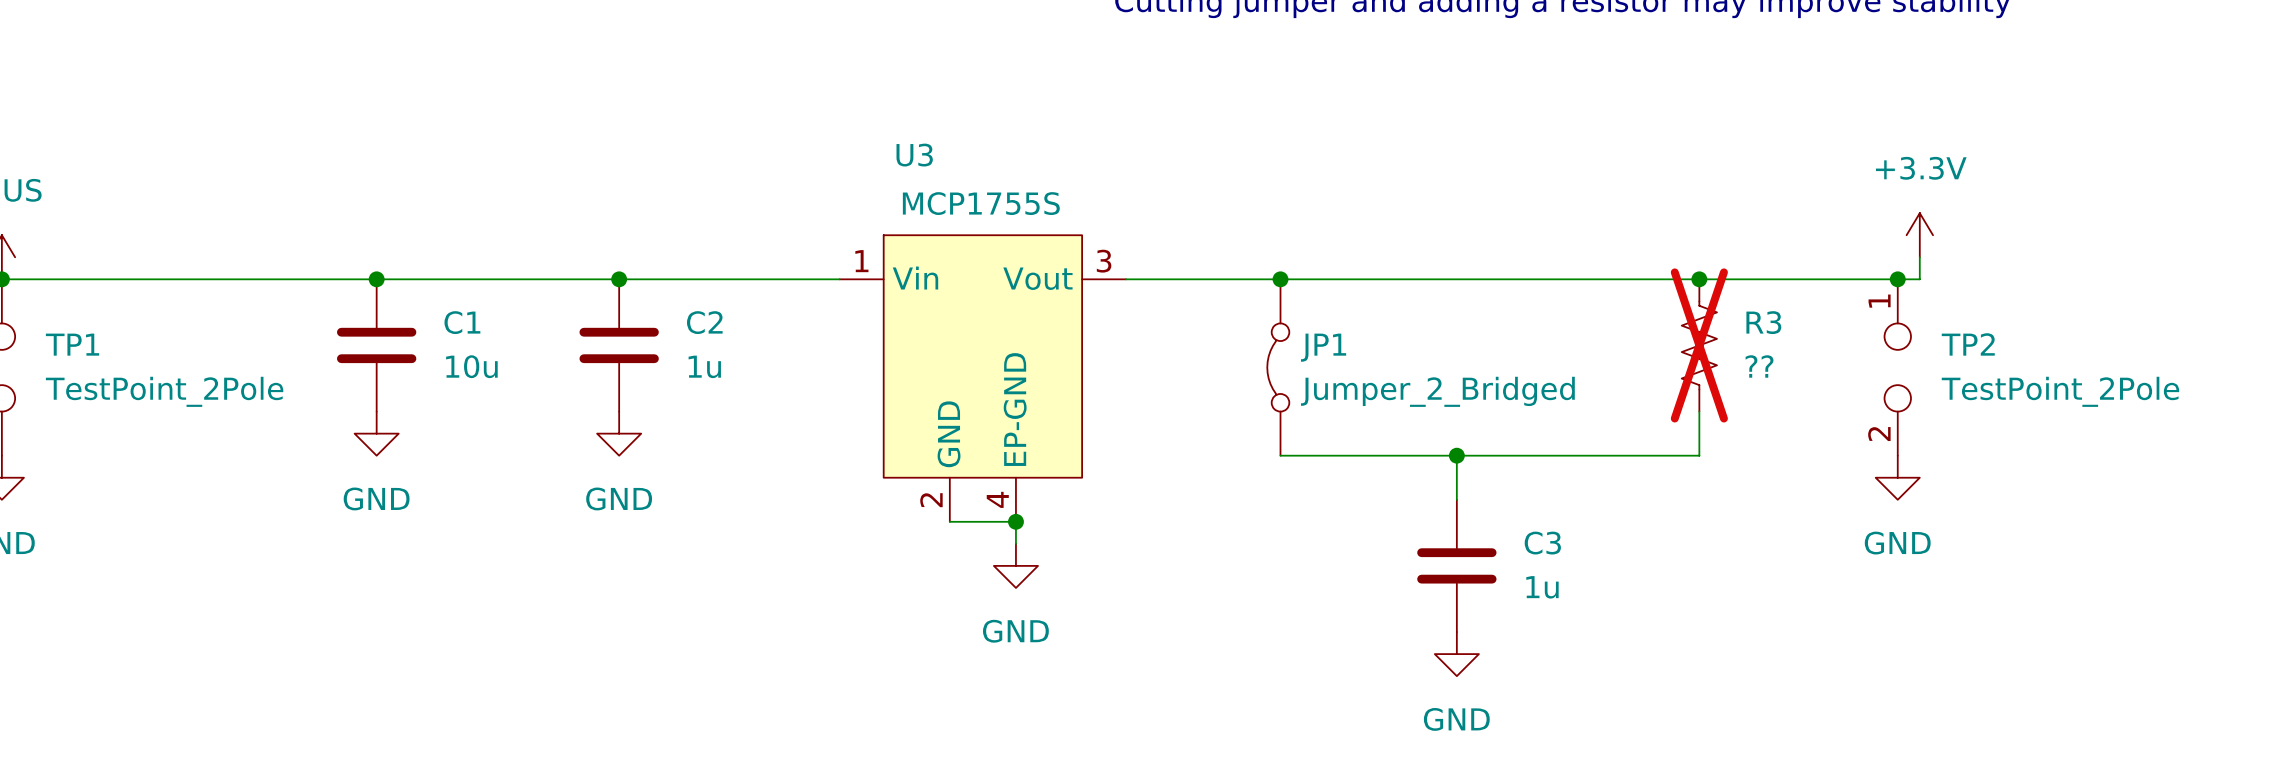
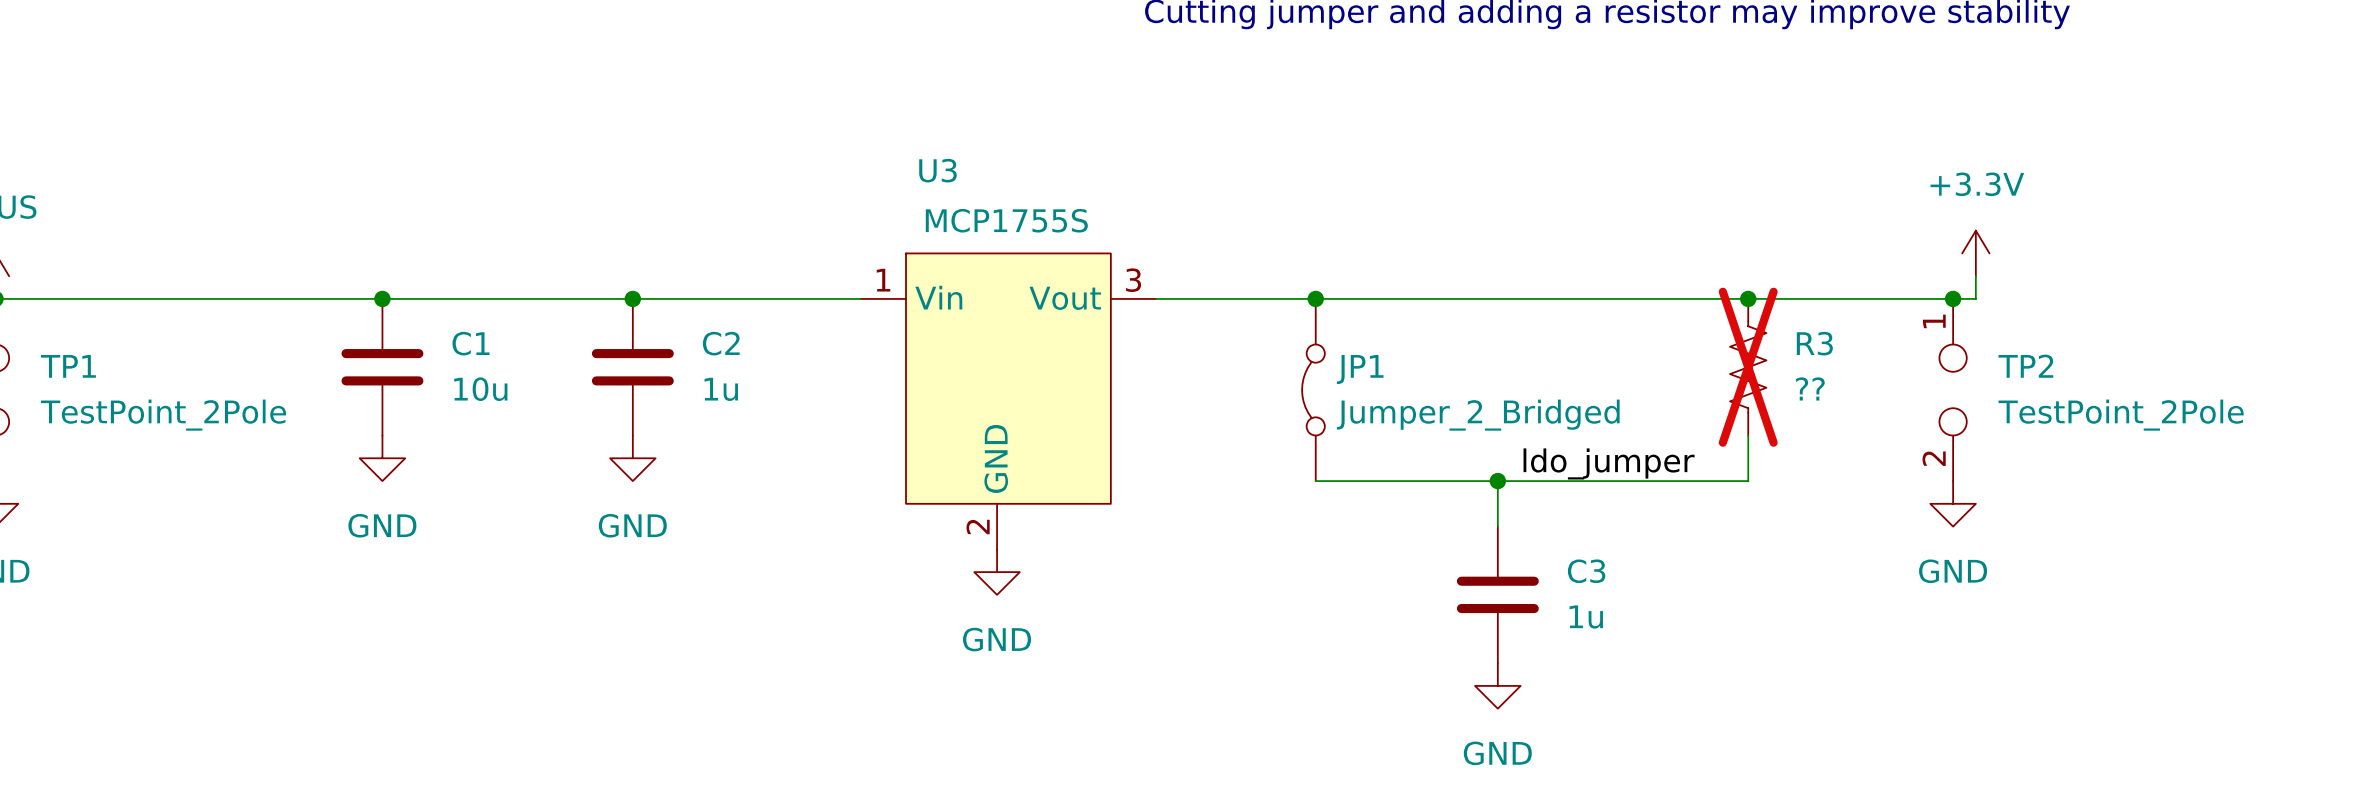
U3 symbol: [839, 235, 1127, 522] -> [860, 253, 1157, 550]
label: none -> ldo_jumper (1609, 463)
wire: (949, 521) (1015, 521) (1015, 543) -> none
junction: (1015, 521) -> none
power symbol position: GND (1015, 565) -> GND (997, 572)

